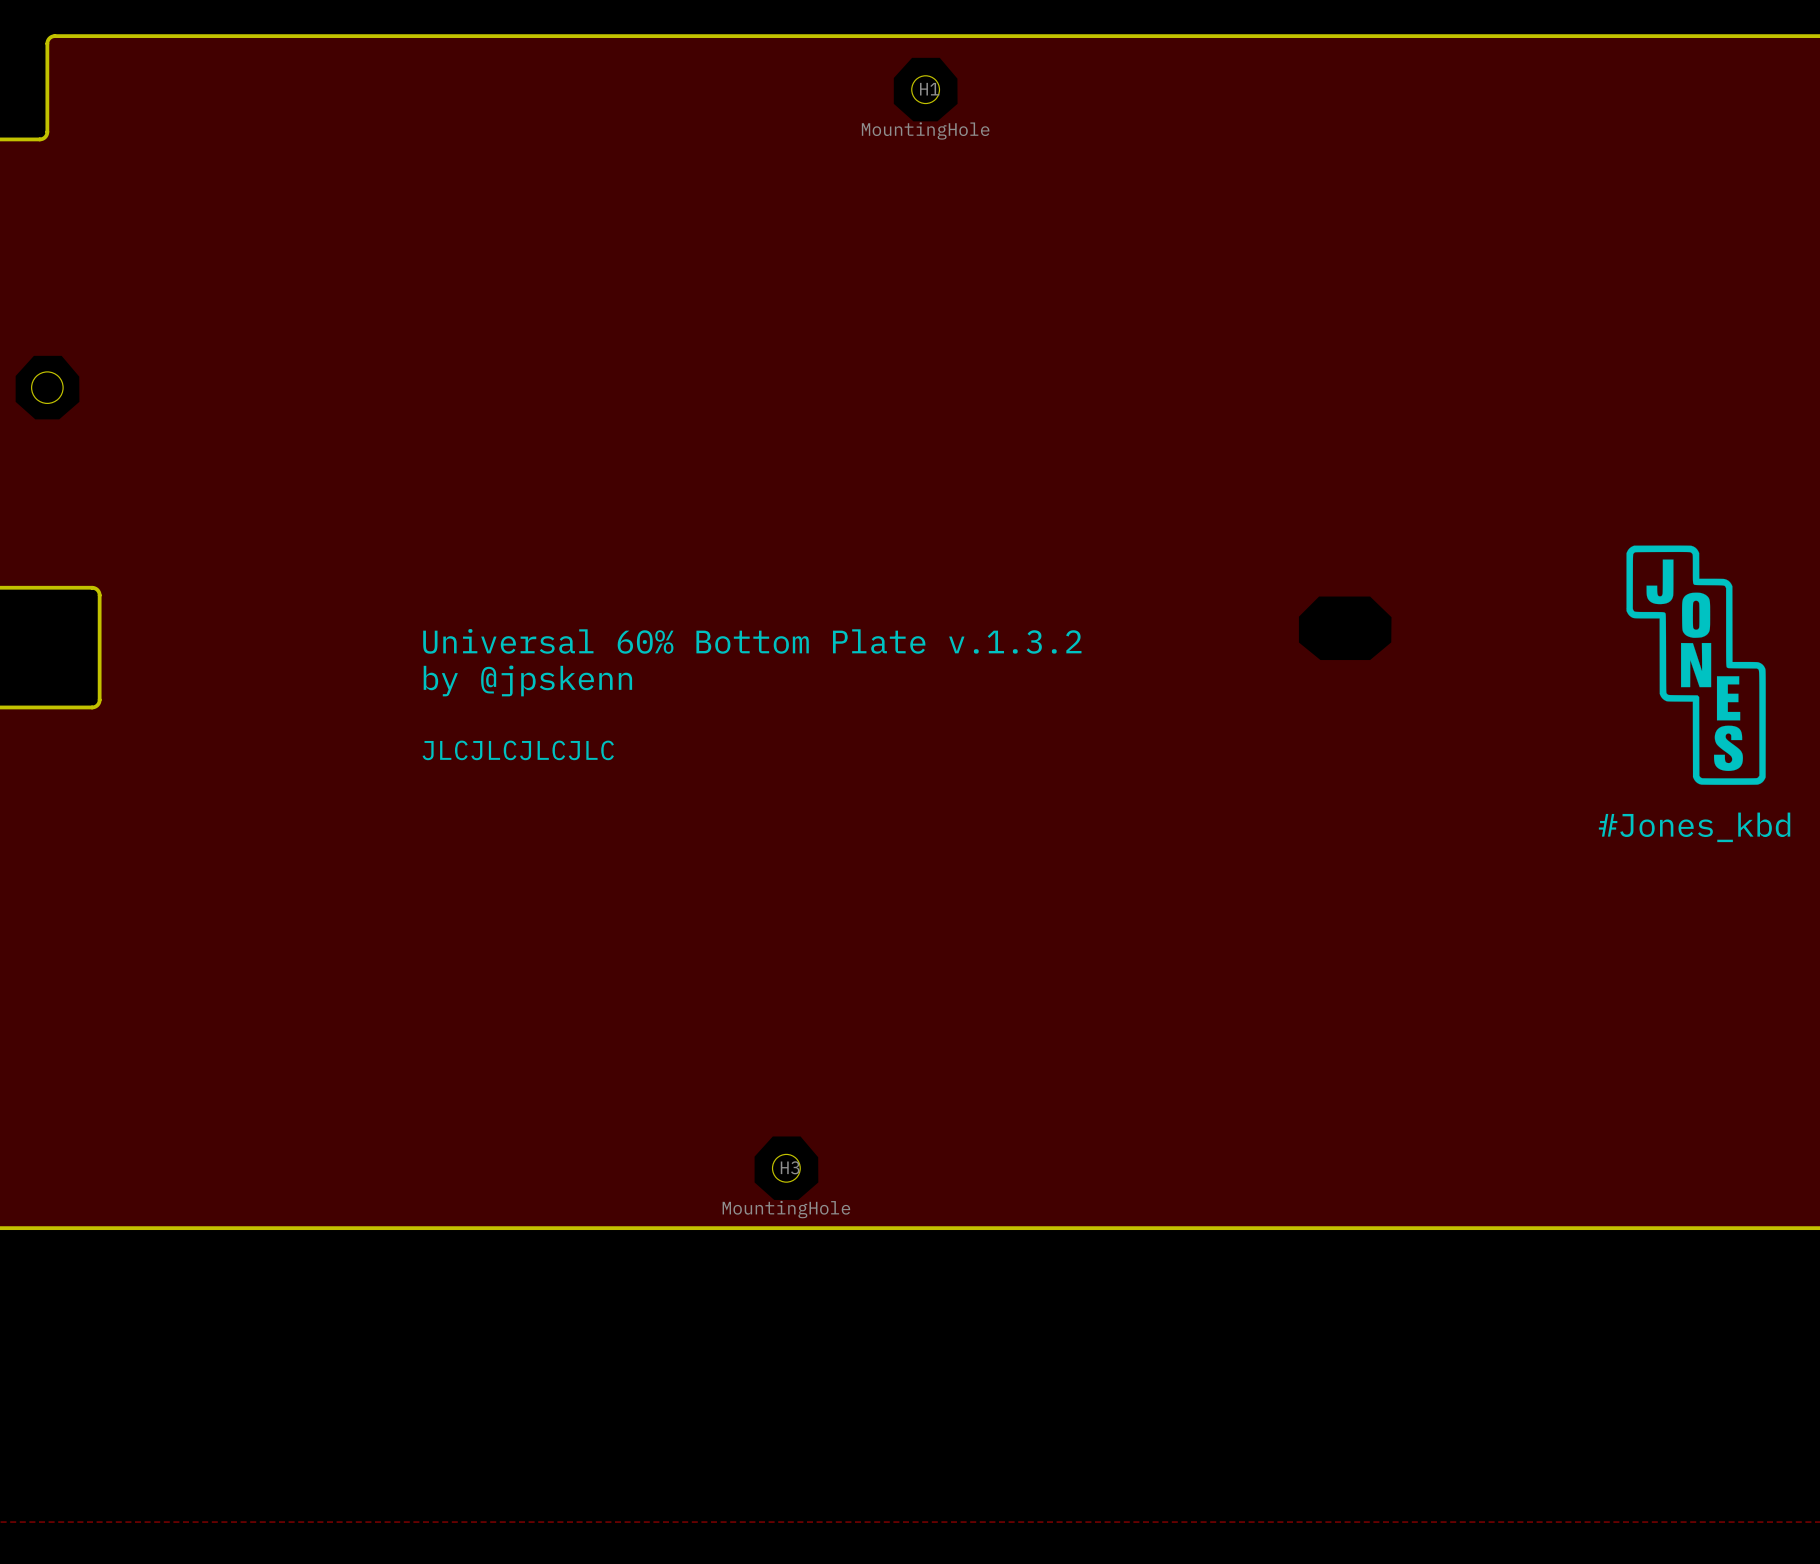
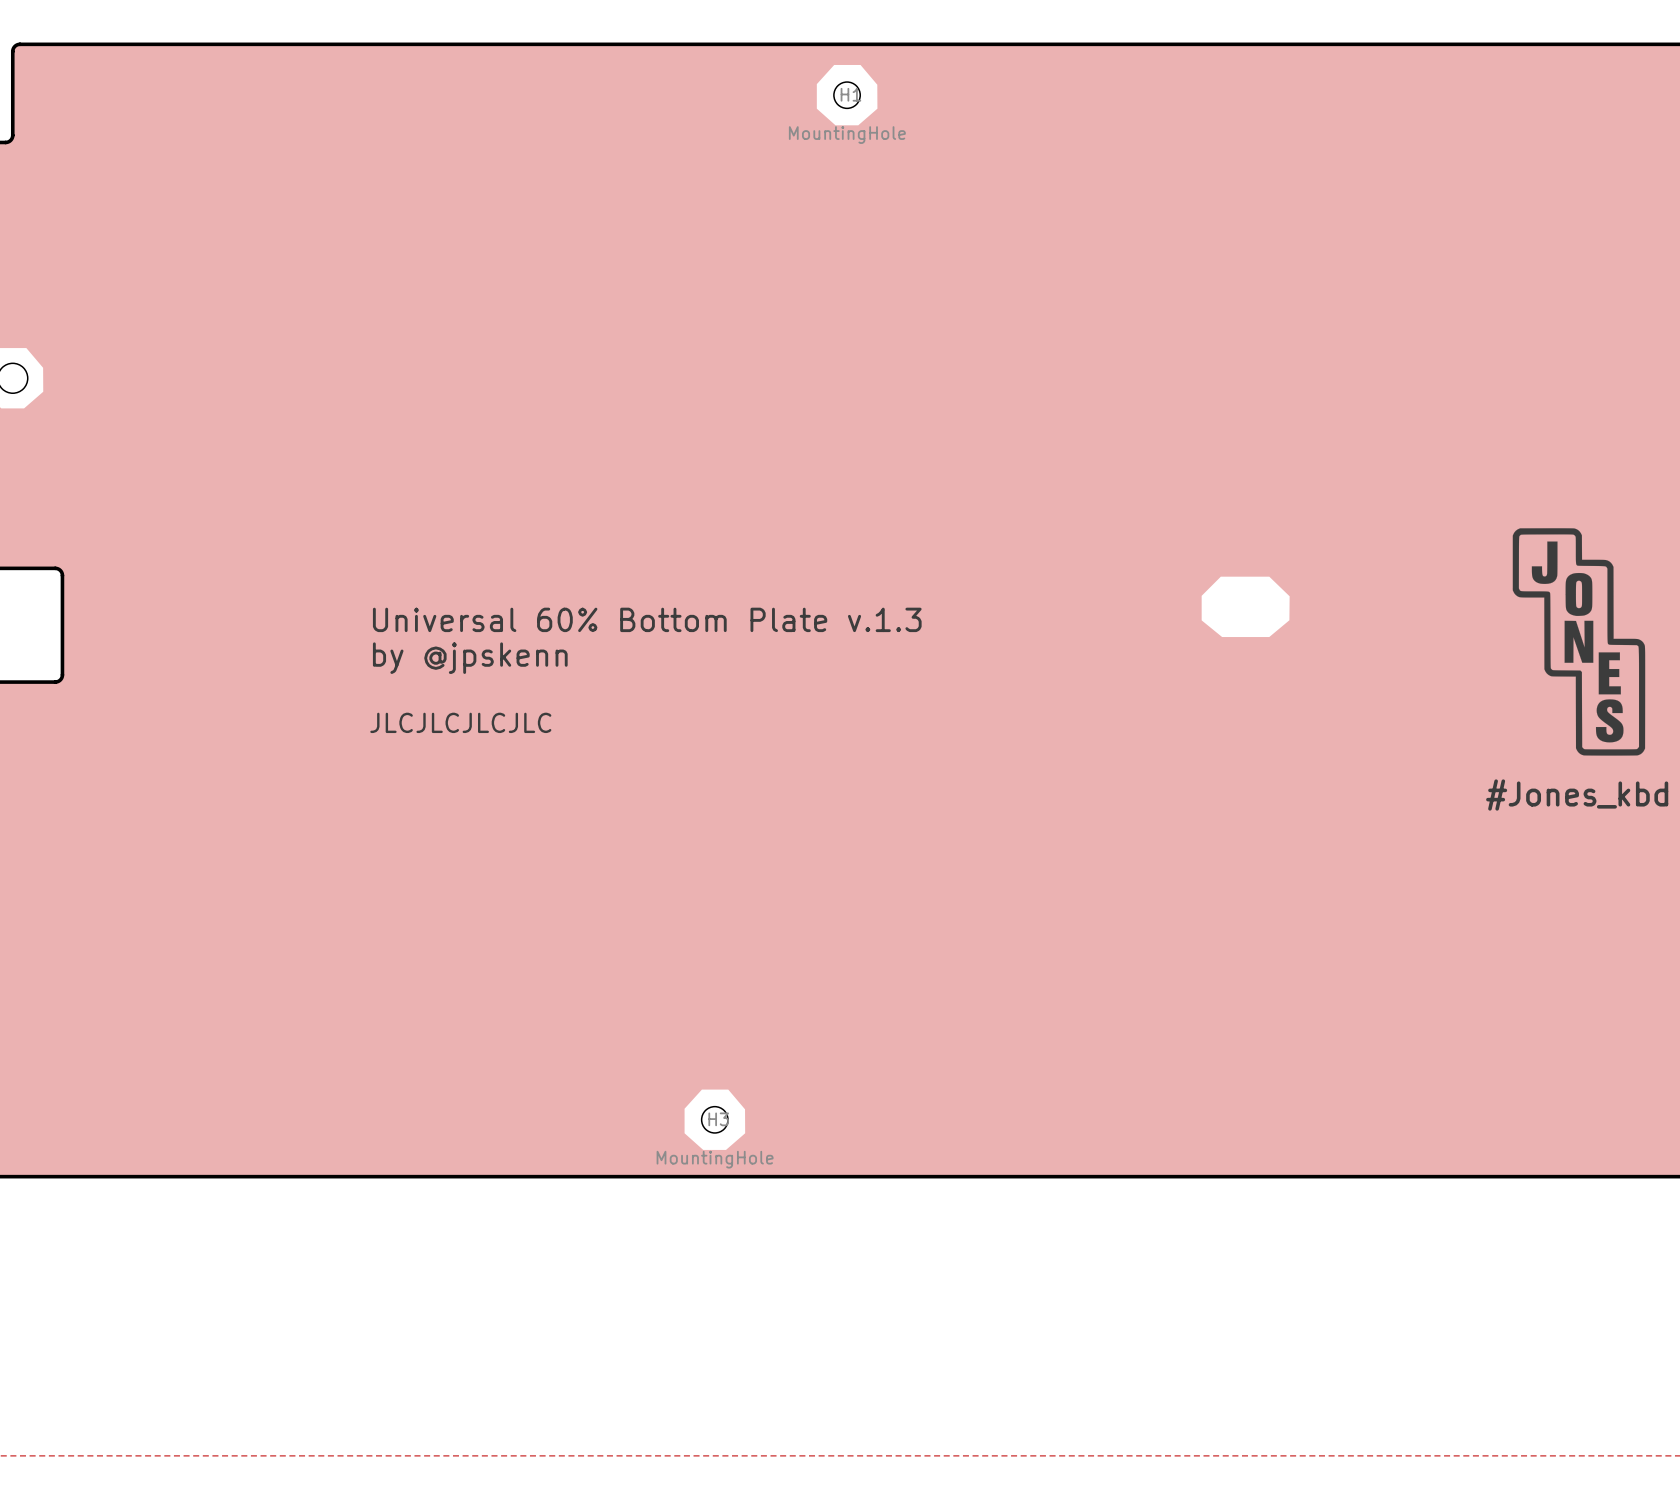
text: Universal 60% Bottom Plate v.1.3.2 (752, 641) -> Universal 60% Bottom Plate v.1.3 (647, 619)

